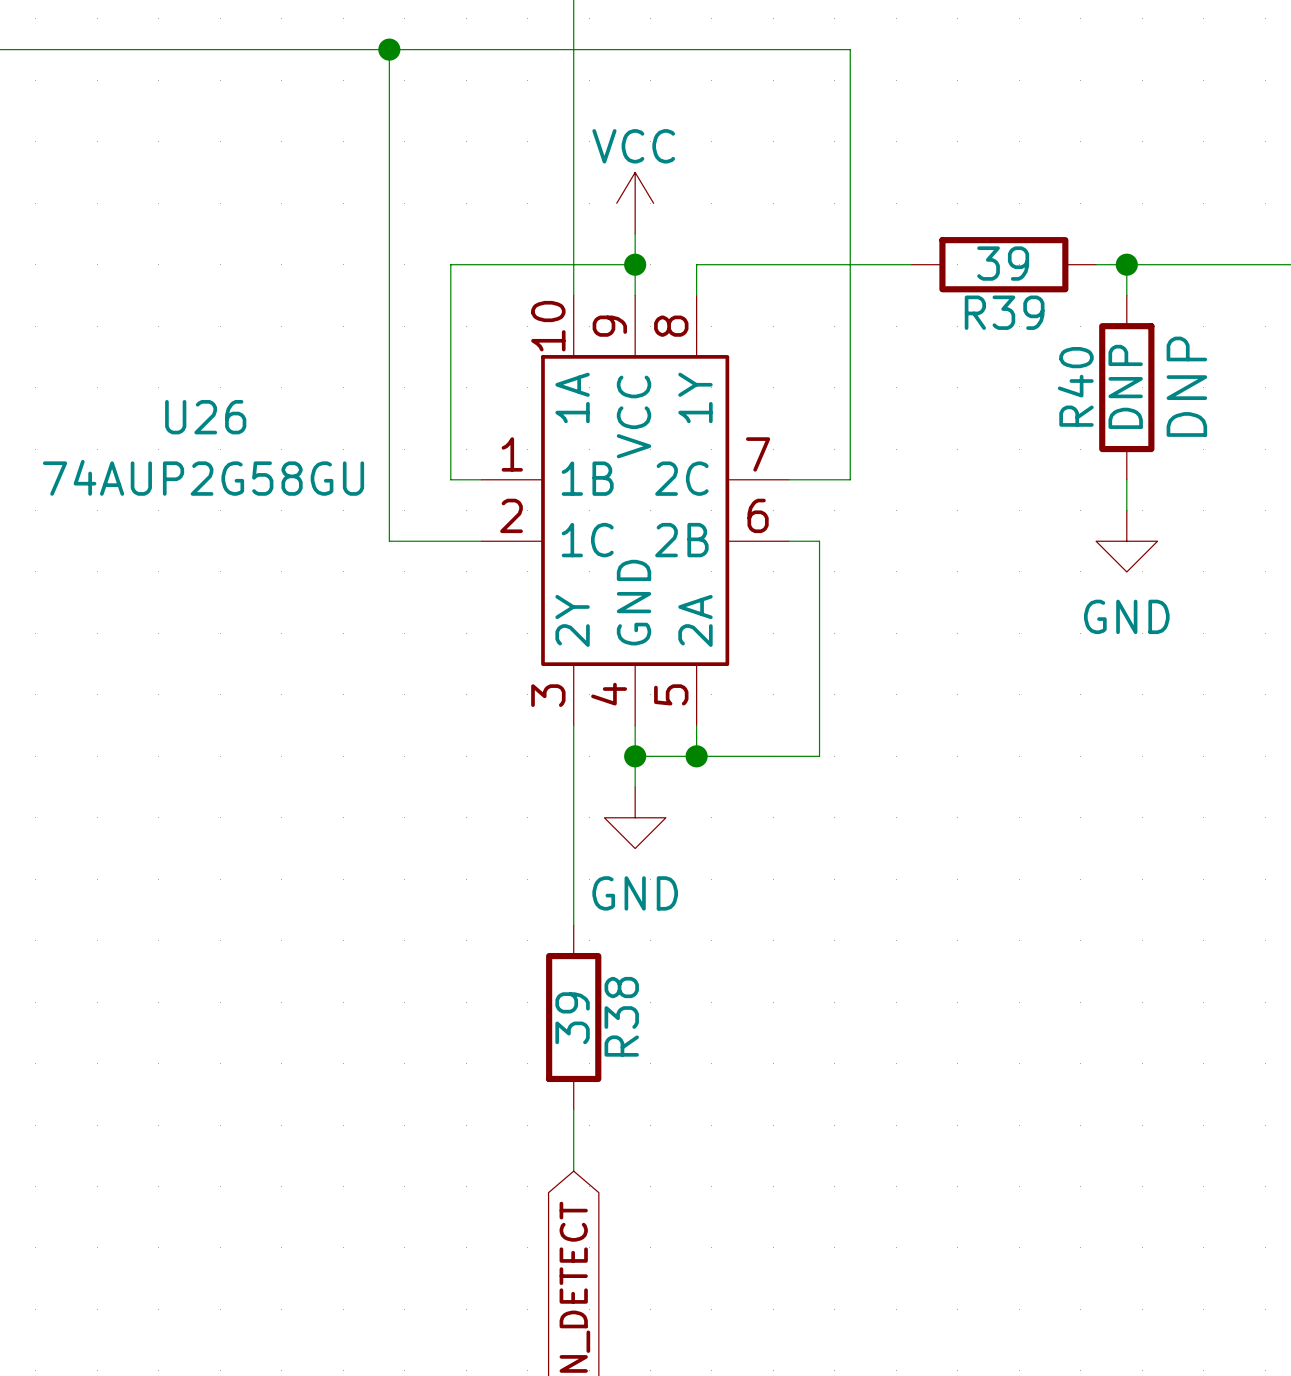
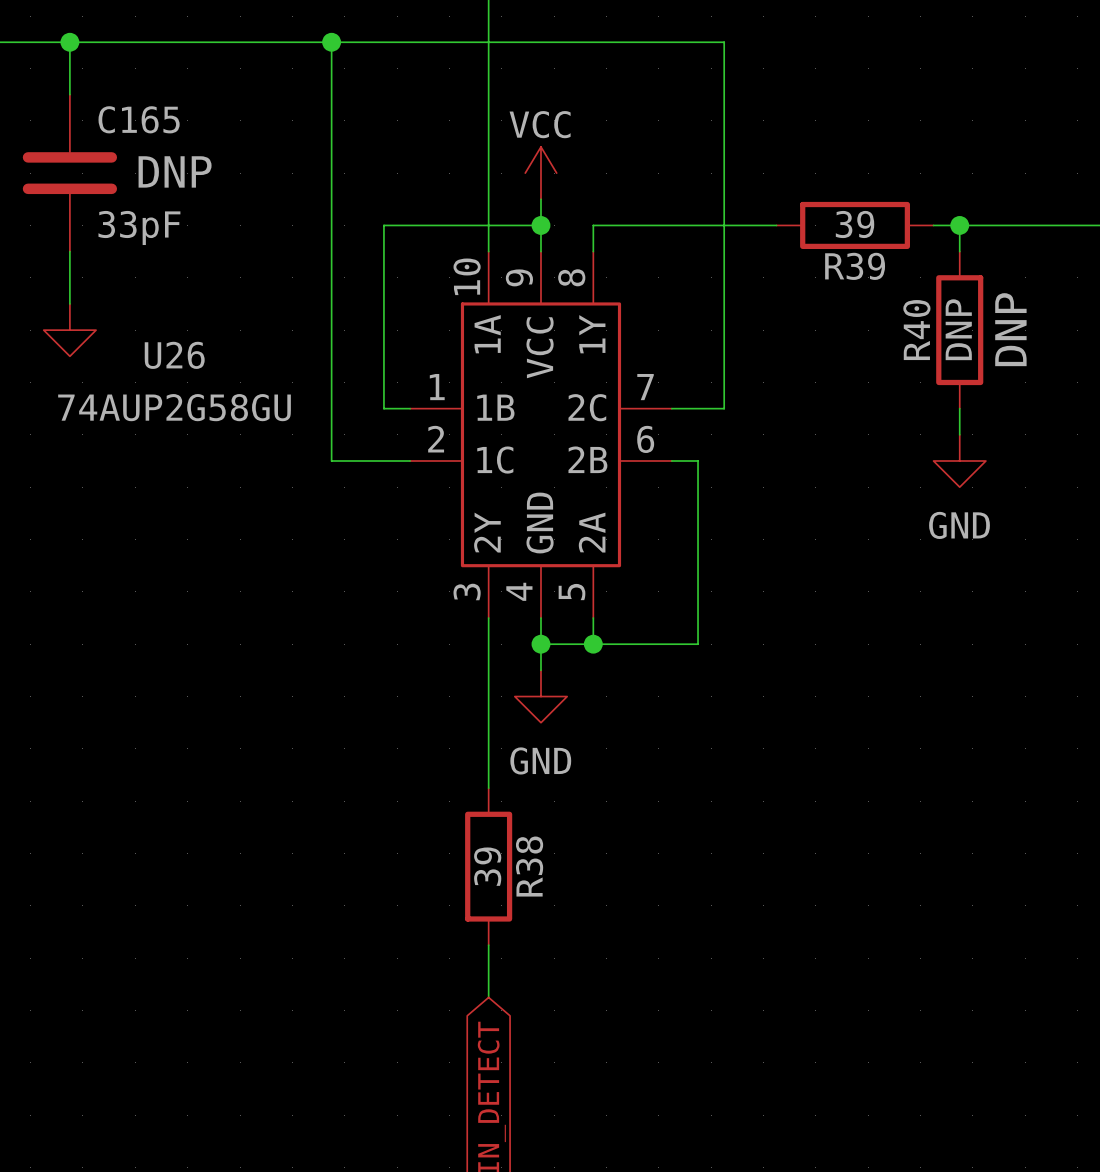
wire: none -> (69, 42) (69, 94)
junction: none -> (69, 42)
C165: none -> 33pF (69, 173)
wire: none -> (69, 251) (69, 303)
power symbol: none -> (69, 330)

